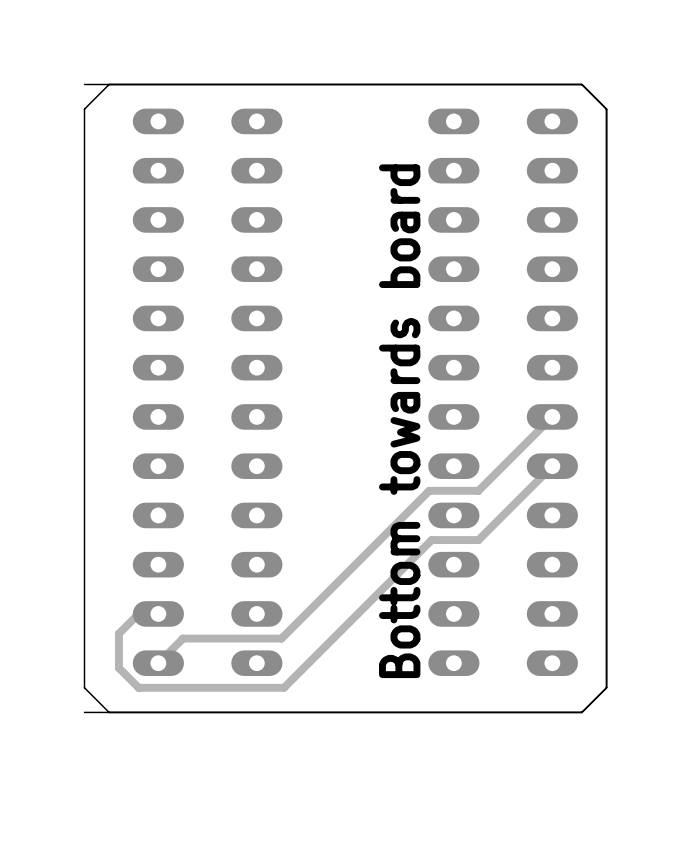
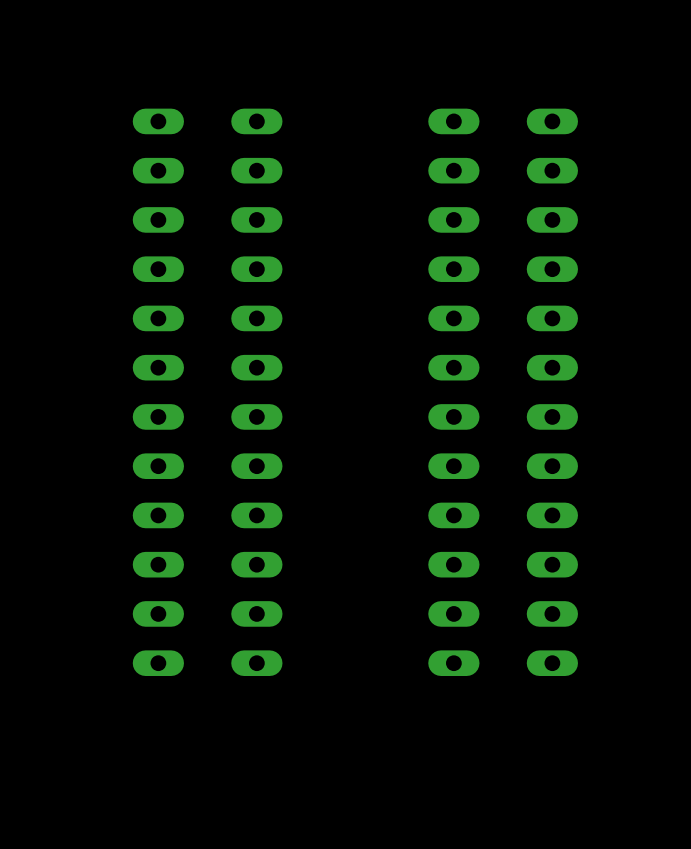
board edge: (84, 84) (581, 84) (606, 109) (606, 687) (581, 712) (84, 712) -> none
board edge: (109, 84) (84, 109) (84, 687) (109, 712) -> none
track: (552, 416) (478, 490) (429, 490) (281, 638) (182, 638) (158, 663) -> none
text: Bottom towards board (399, 421) -> none
track: (552, 466) (478, 540) (431, 540) (283, 687) (138, 687) (118, 668) (118, 633) (138, 613) (158, 613) -> none

